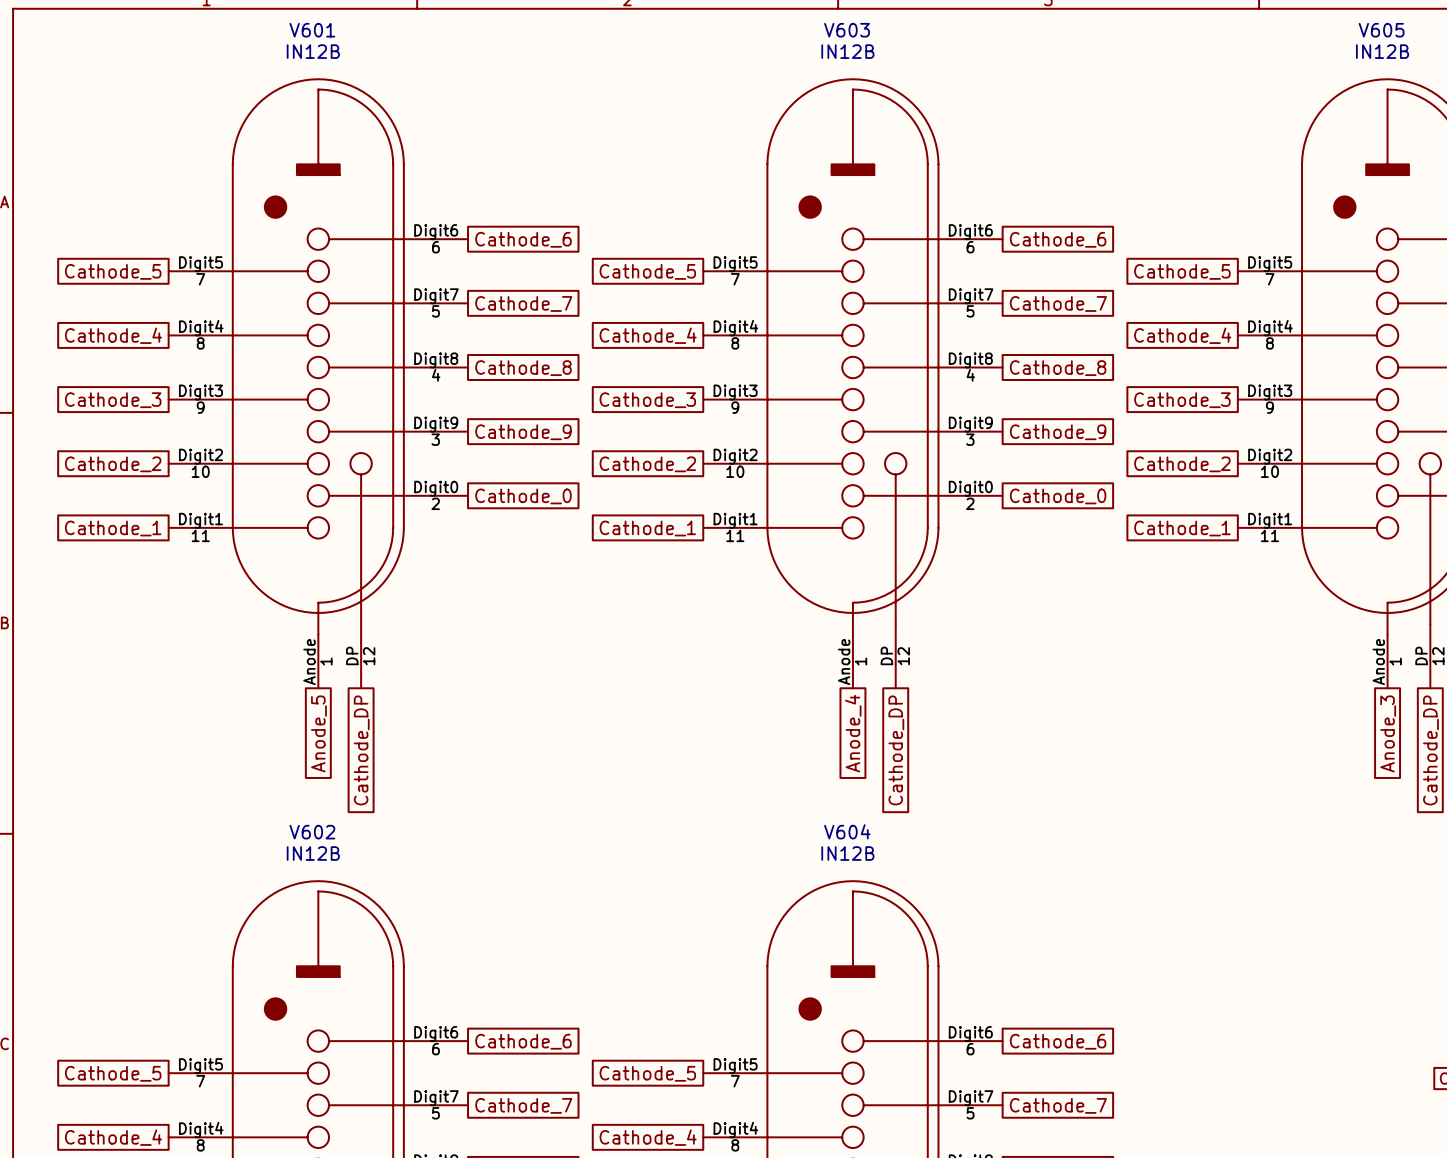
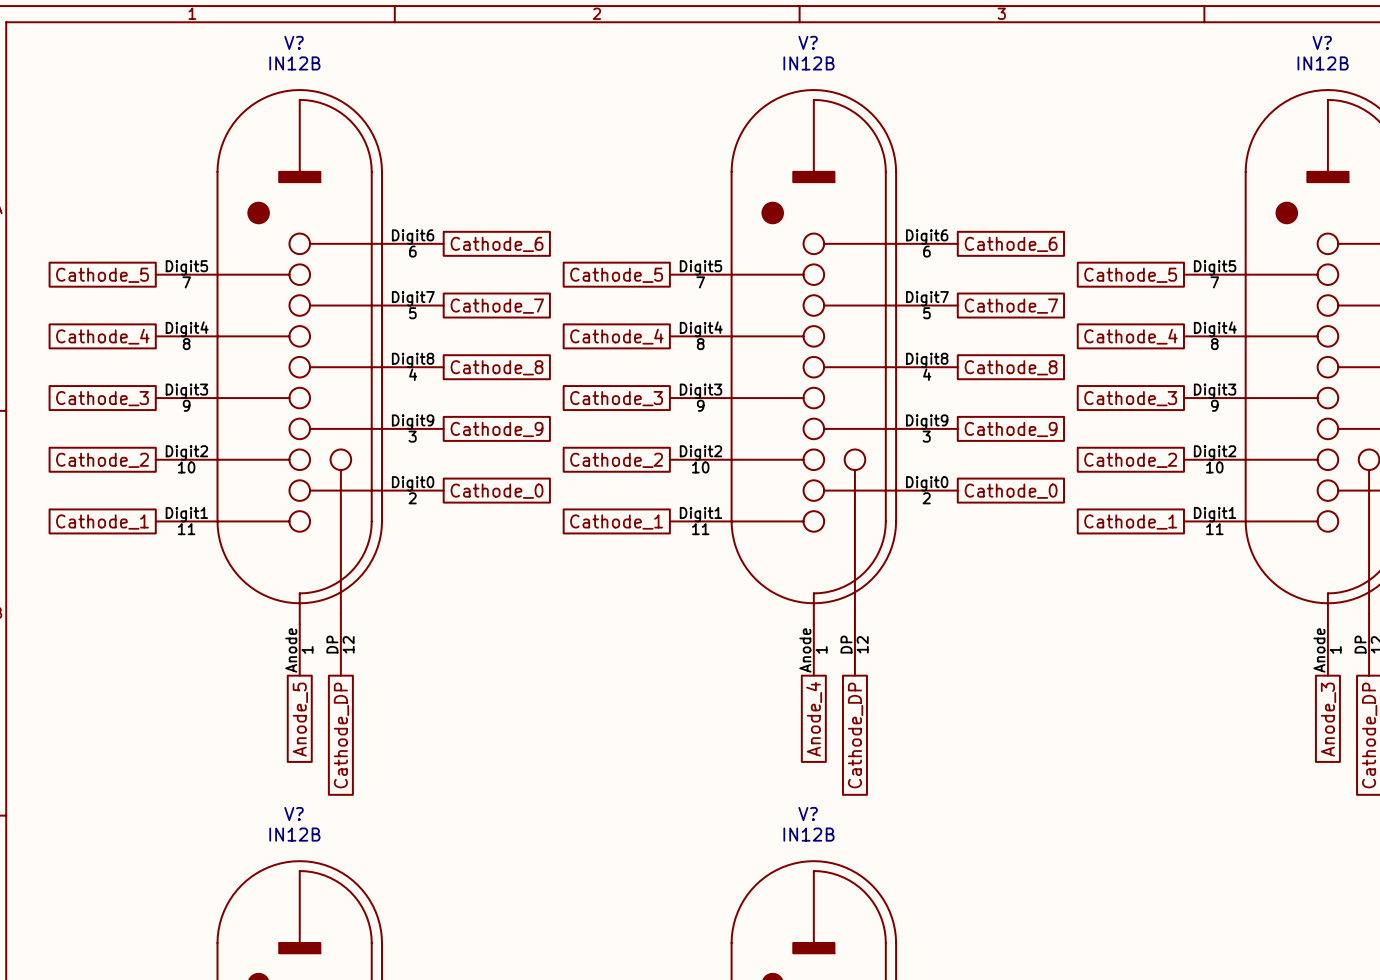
V601 name: V601 (312, 30) -> V? (294, 42)
V603 name: V603 (846, 30) -> V? (808, 42)
V605 name: V605 (1381, 30) -> V? (1322, 42)
V604 name: V604 (847, 831) -> V? (808, 814)
V602 name: V602 (312, 832) -> V? (294, 814)

